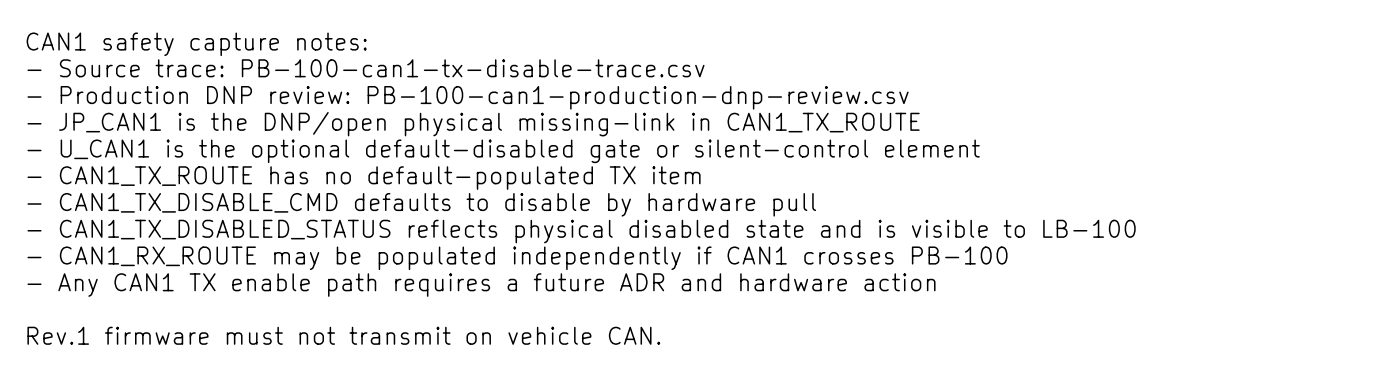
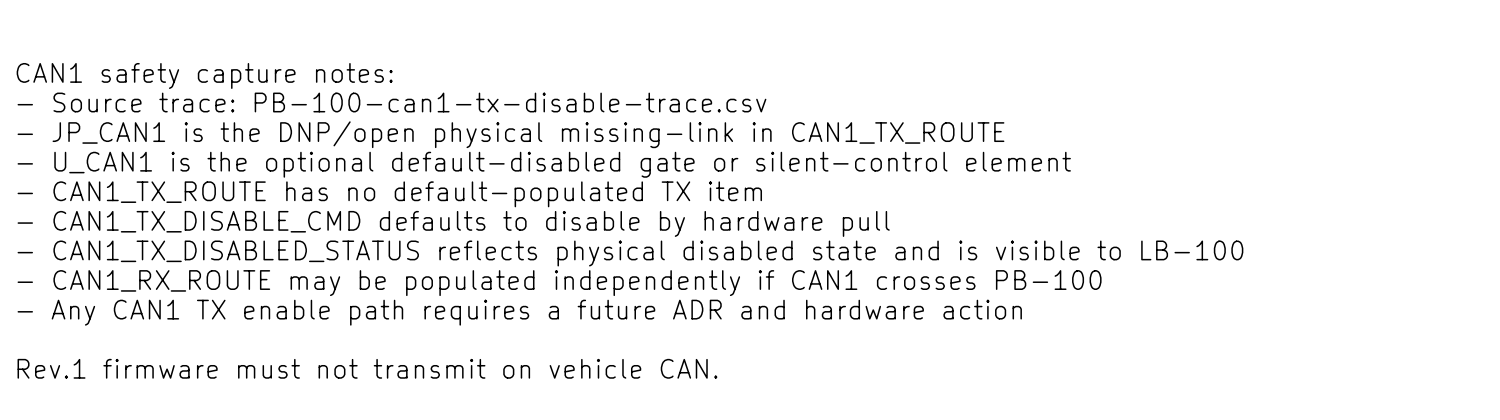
text: CAN1 safety capture notes: (196, 44) -> none
text: - Source trace: PB-100-can1-tx-disable-trace.csv (365, 68) -> CAN1 safety capture notes: (204, 75)
text: - Production DNP review: PB-100-can1-production-dnp-review.csv (468, 97) -> - Source trace: PB-100-can1-tx-disable-trace.csv (391, 102)

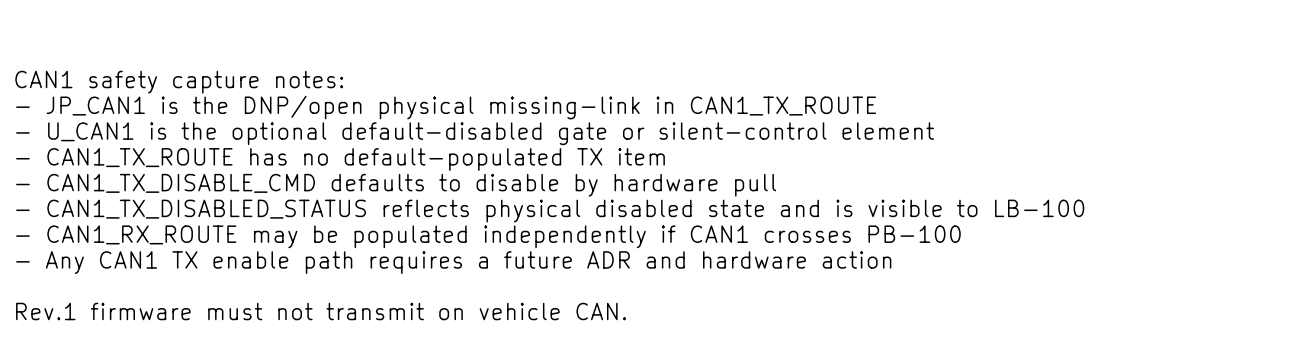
text: CAN1 safety capture notes: (204, 75) -> none
text: - Source trace: PB-100-can1-tx-disable-trace.csv (391, 102) -> CAN1 safety capture notes: (179, 82)

